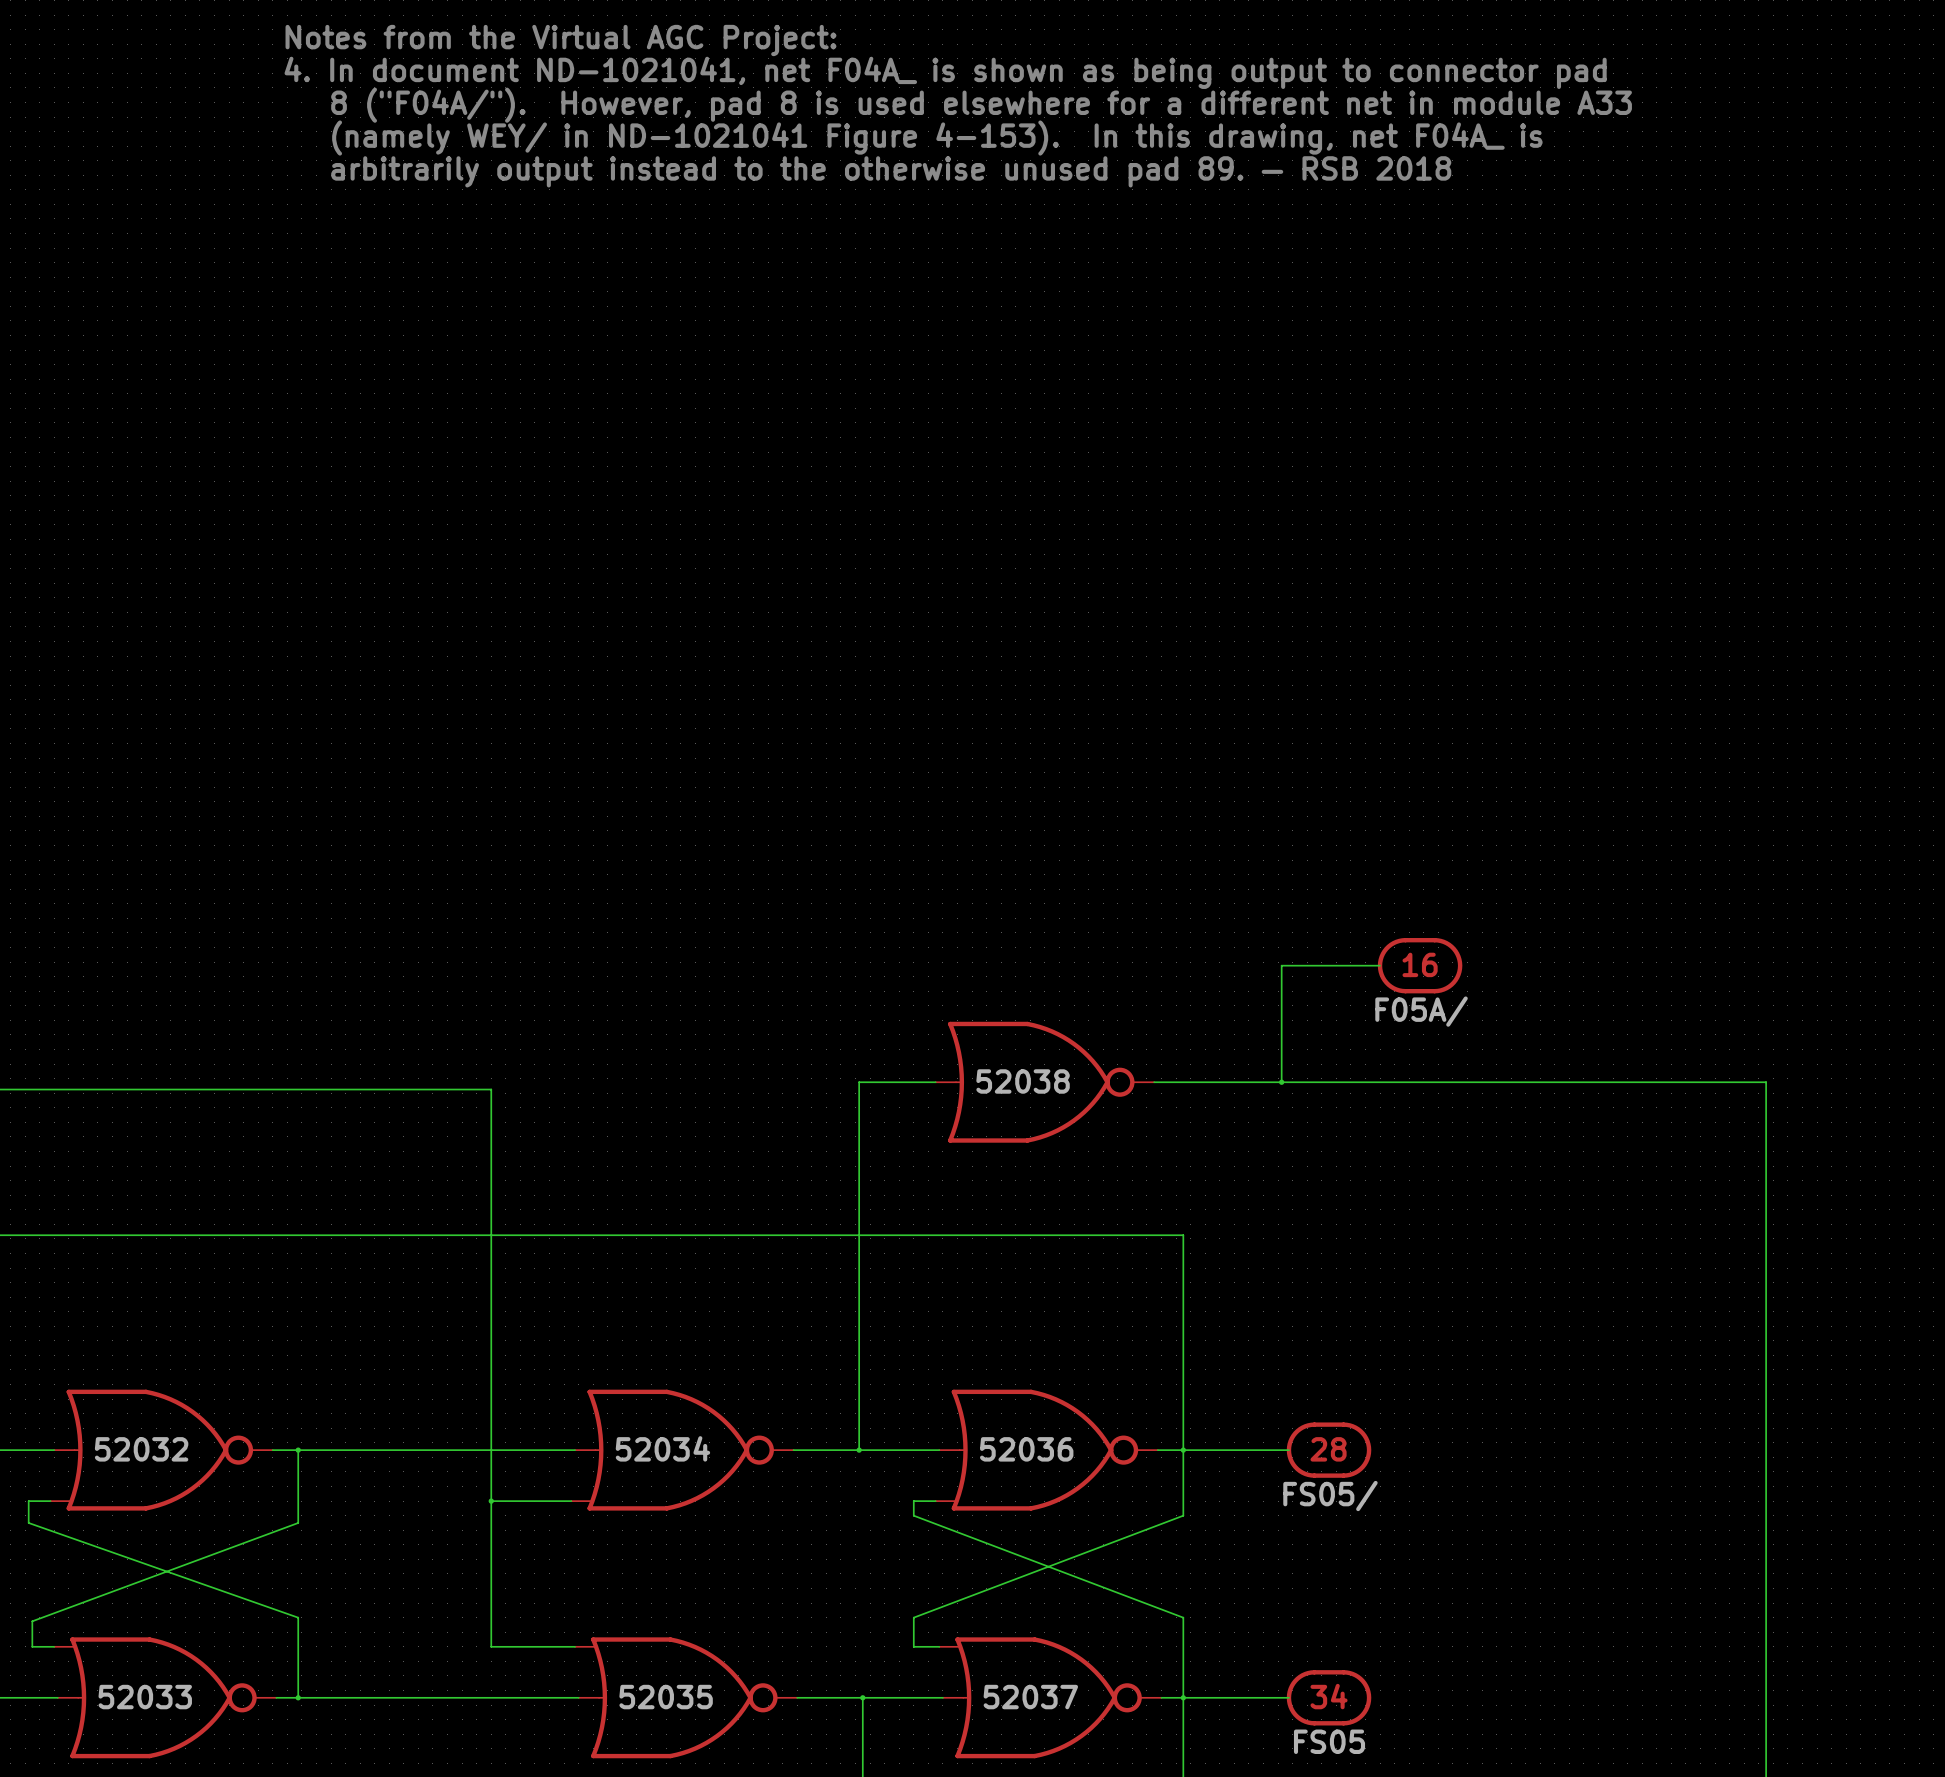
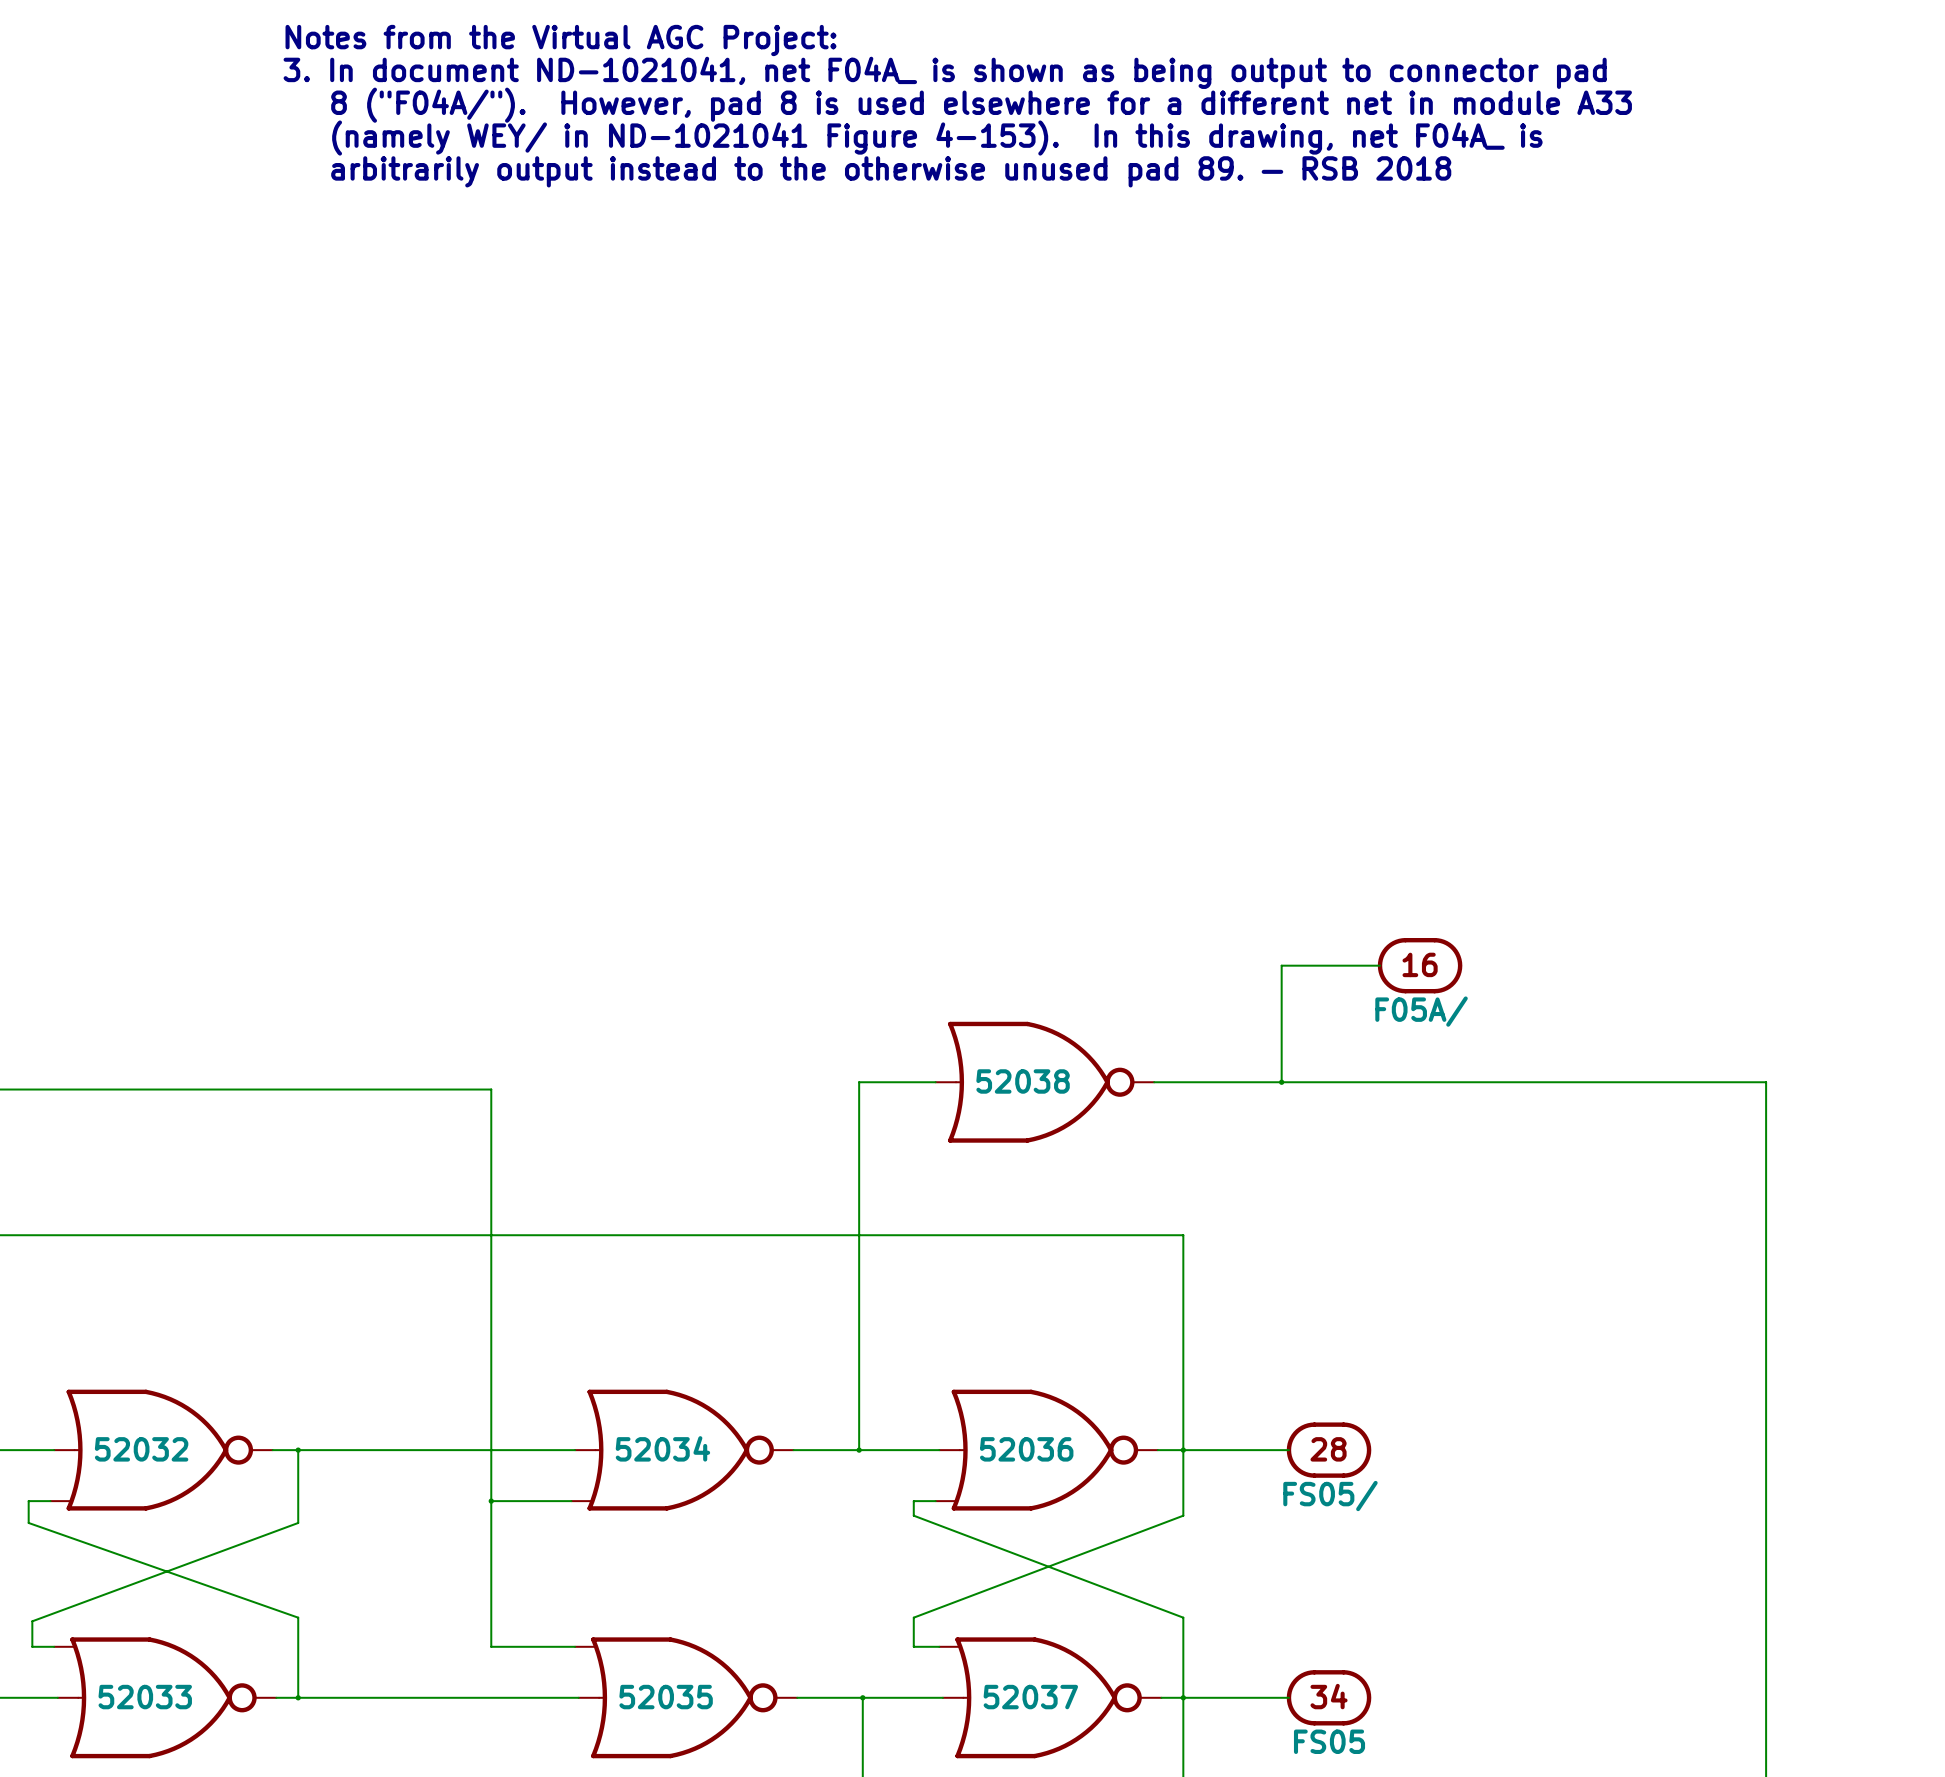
text: 4. In document ND-1021041, net F04A_ is shown as being output to connector pad (945, 72) -> 3. In document ND-1021041, net F04A_ is shown as being output to connector pad (945, 72)

